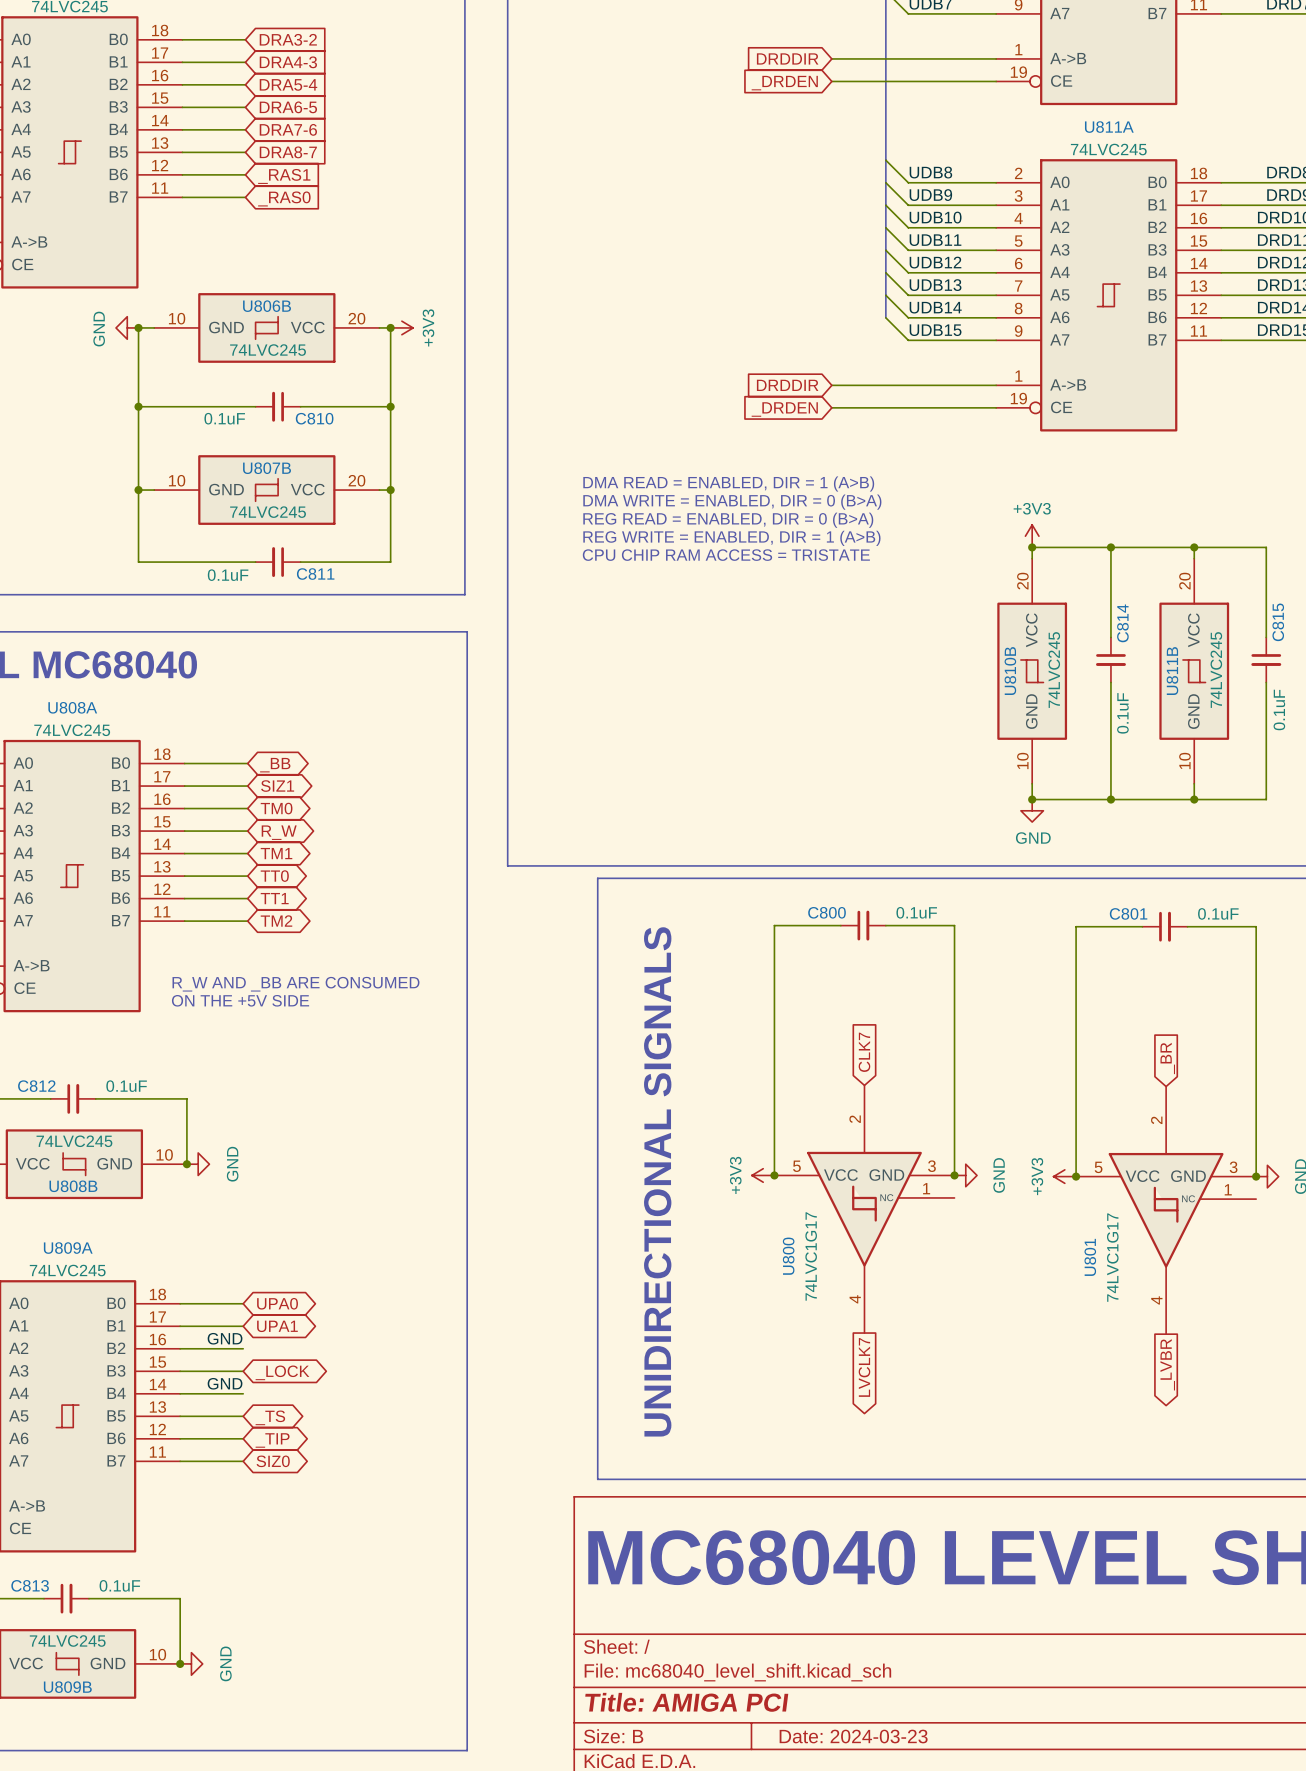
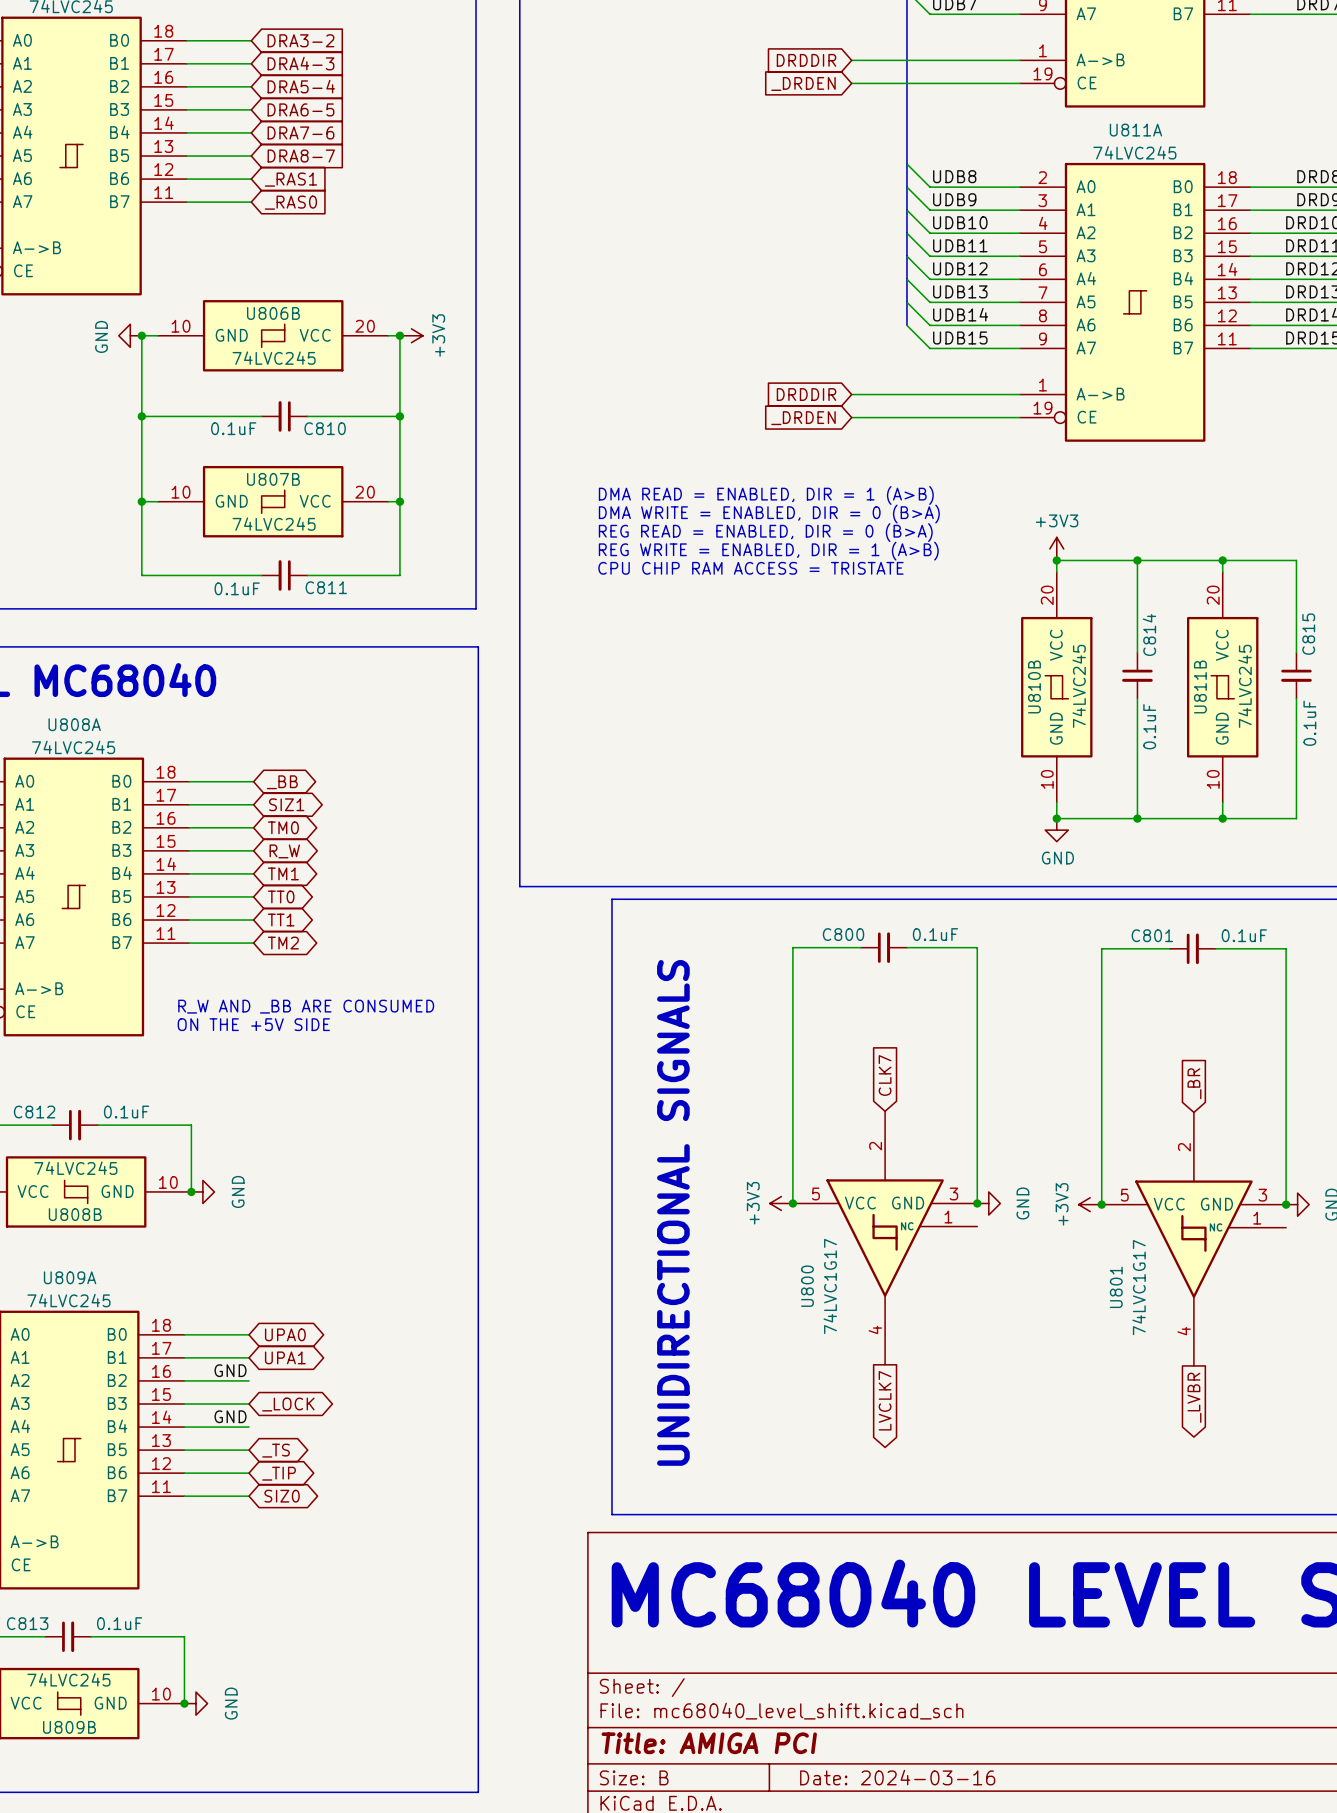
title block: Date: 2024-03-23 (853, 1736) -> Date: 2024-03-16 (897, 1777)

